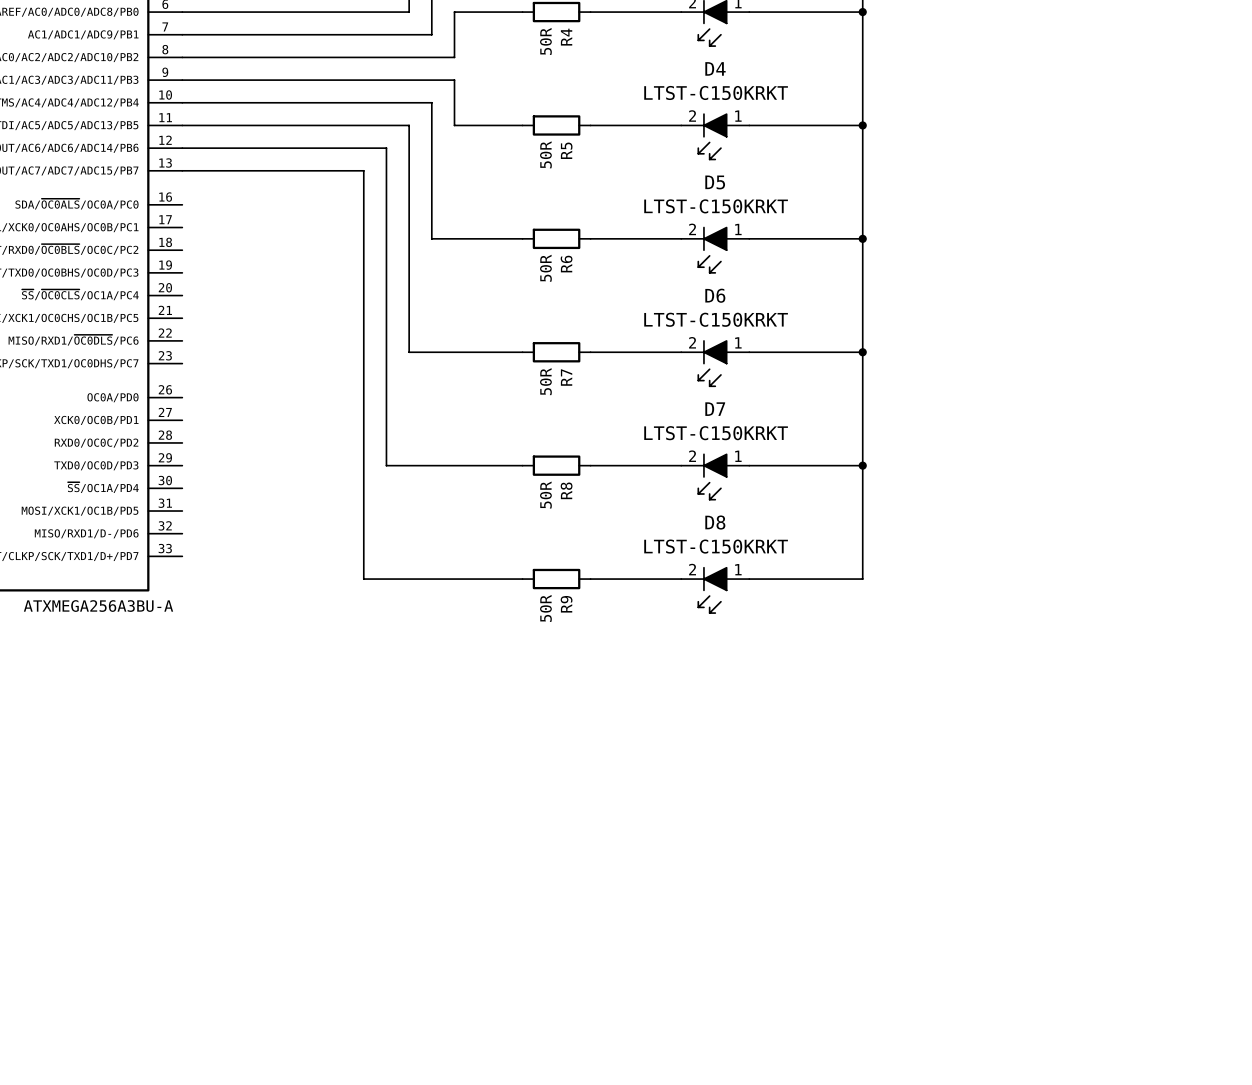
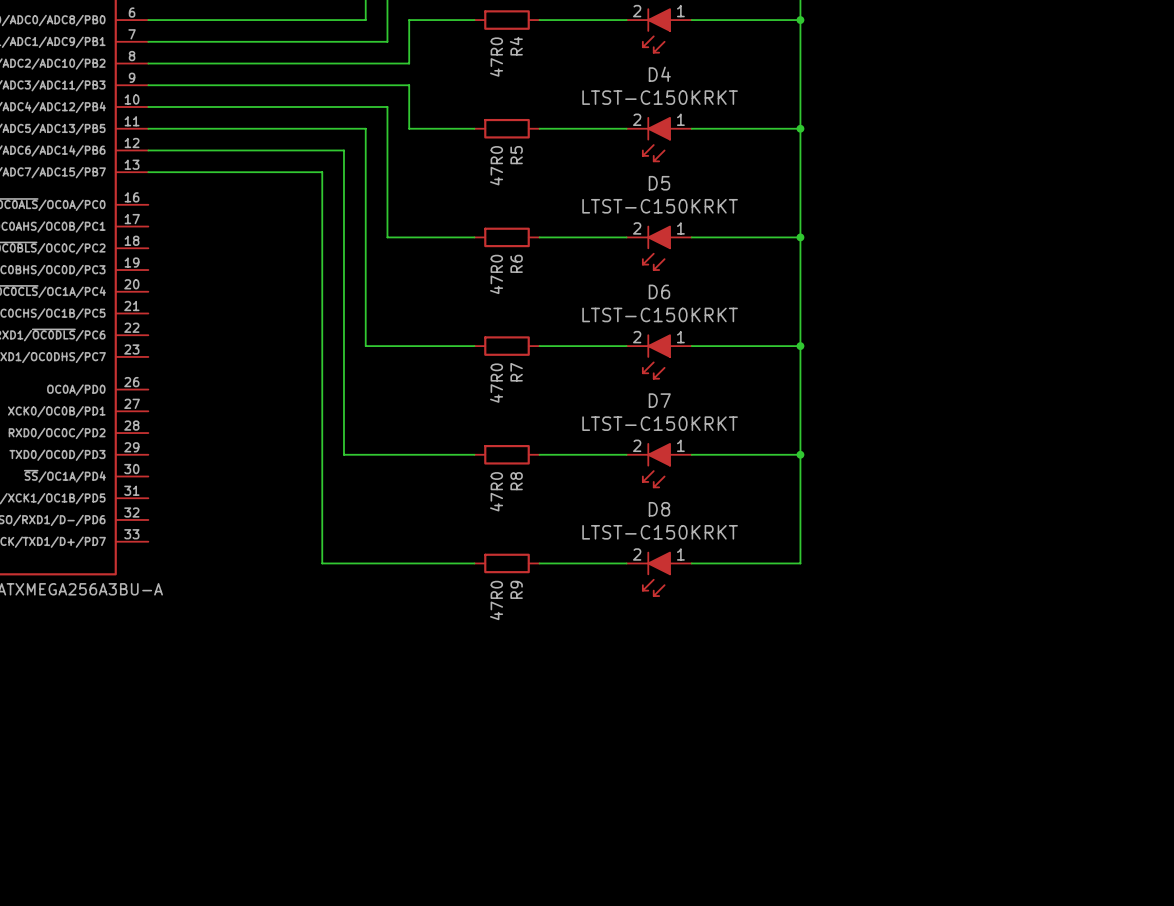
R4 value: 50R (545, 41) -> 47R0 (496, 57)
R5 value: 50R (545, 154) -> 47R0 (496, 165)
R6 value: 50R (545, 268) -> 47R0 (496, 274)
R7 value: 50R (545, 381) -> 47R0 (496, 383)
R8 value: 50R (545, 495) -> 47R0 (496, 491)
R9 value: 50R (545, 608) -> 47R0 (496, 600)

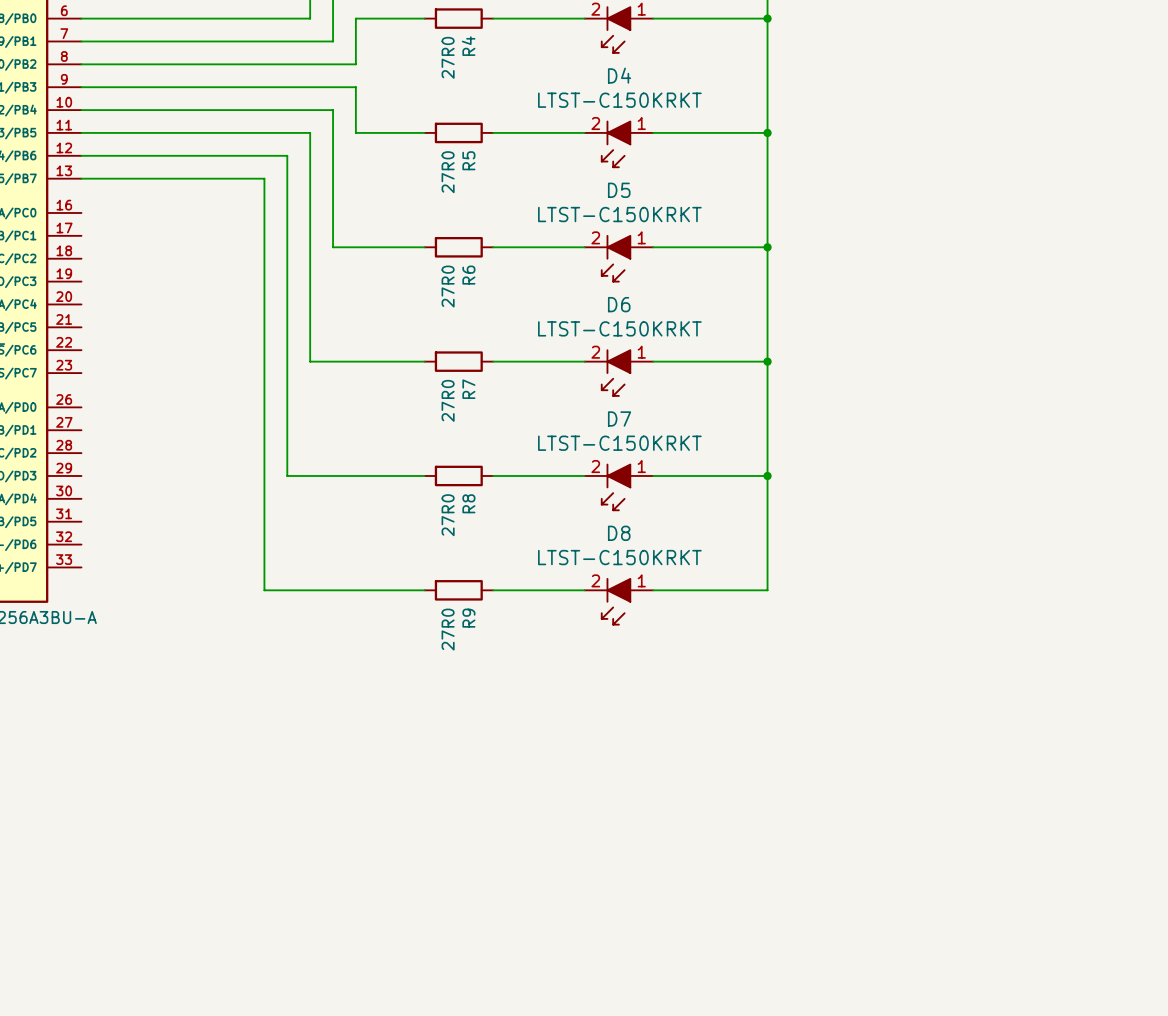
R4 value: 47R0 (496, 57) -> 27R0 (448, 57)
R5 value: 47R0 (496, 165) -> 27R0 (448, 172)
R6 value: 47R0 (496, 274) -> 27R0 (448, 286)
R7 value: 47R0 (496, 383) -> 27R0 (448, 400)
R8 value: 47R0 (496, 491) -> 27R0 (448, 515)
R9 value: 47R0 (496, 600) -> 27R0 (448, 629)

